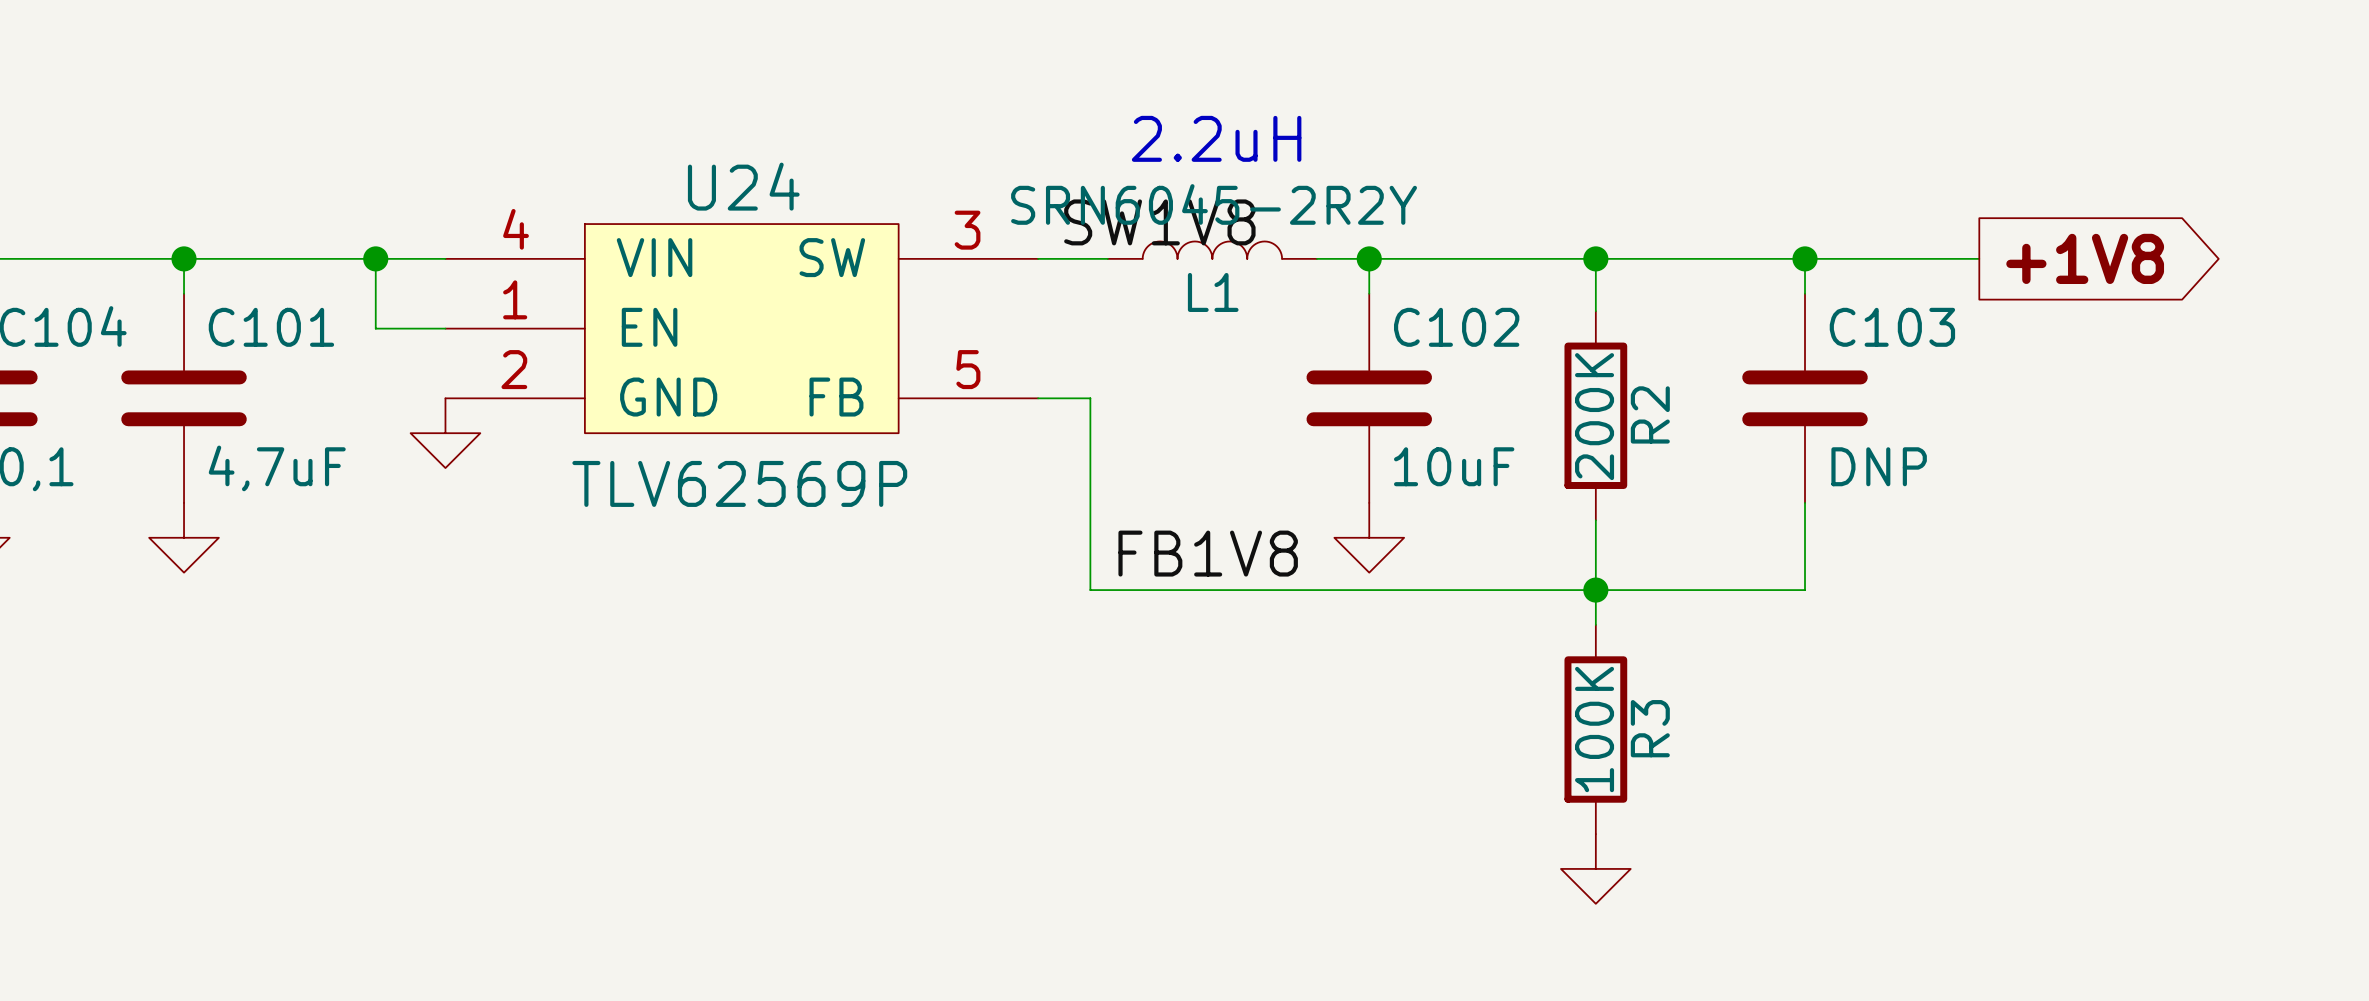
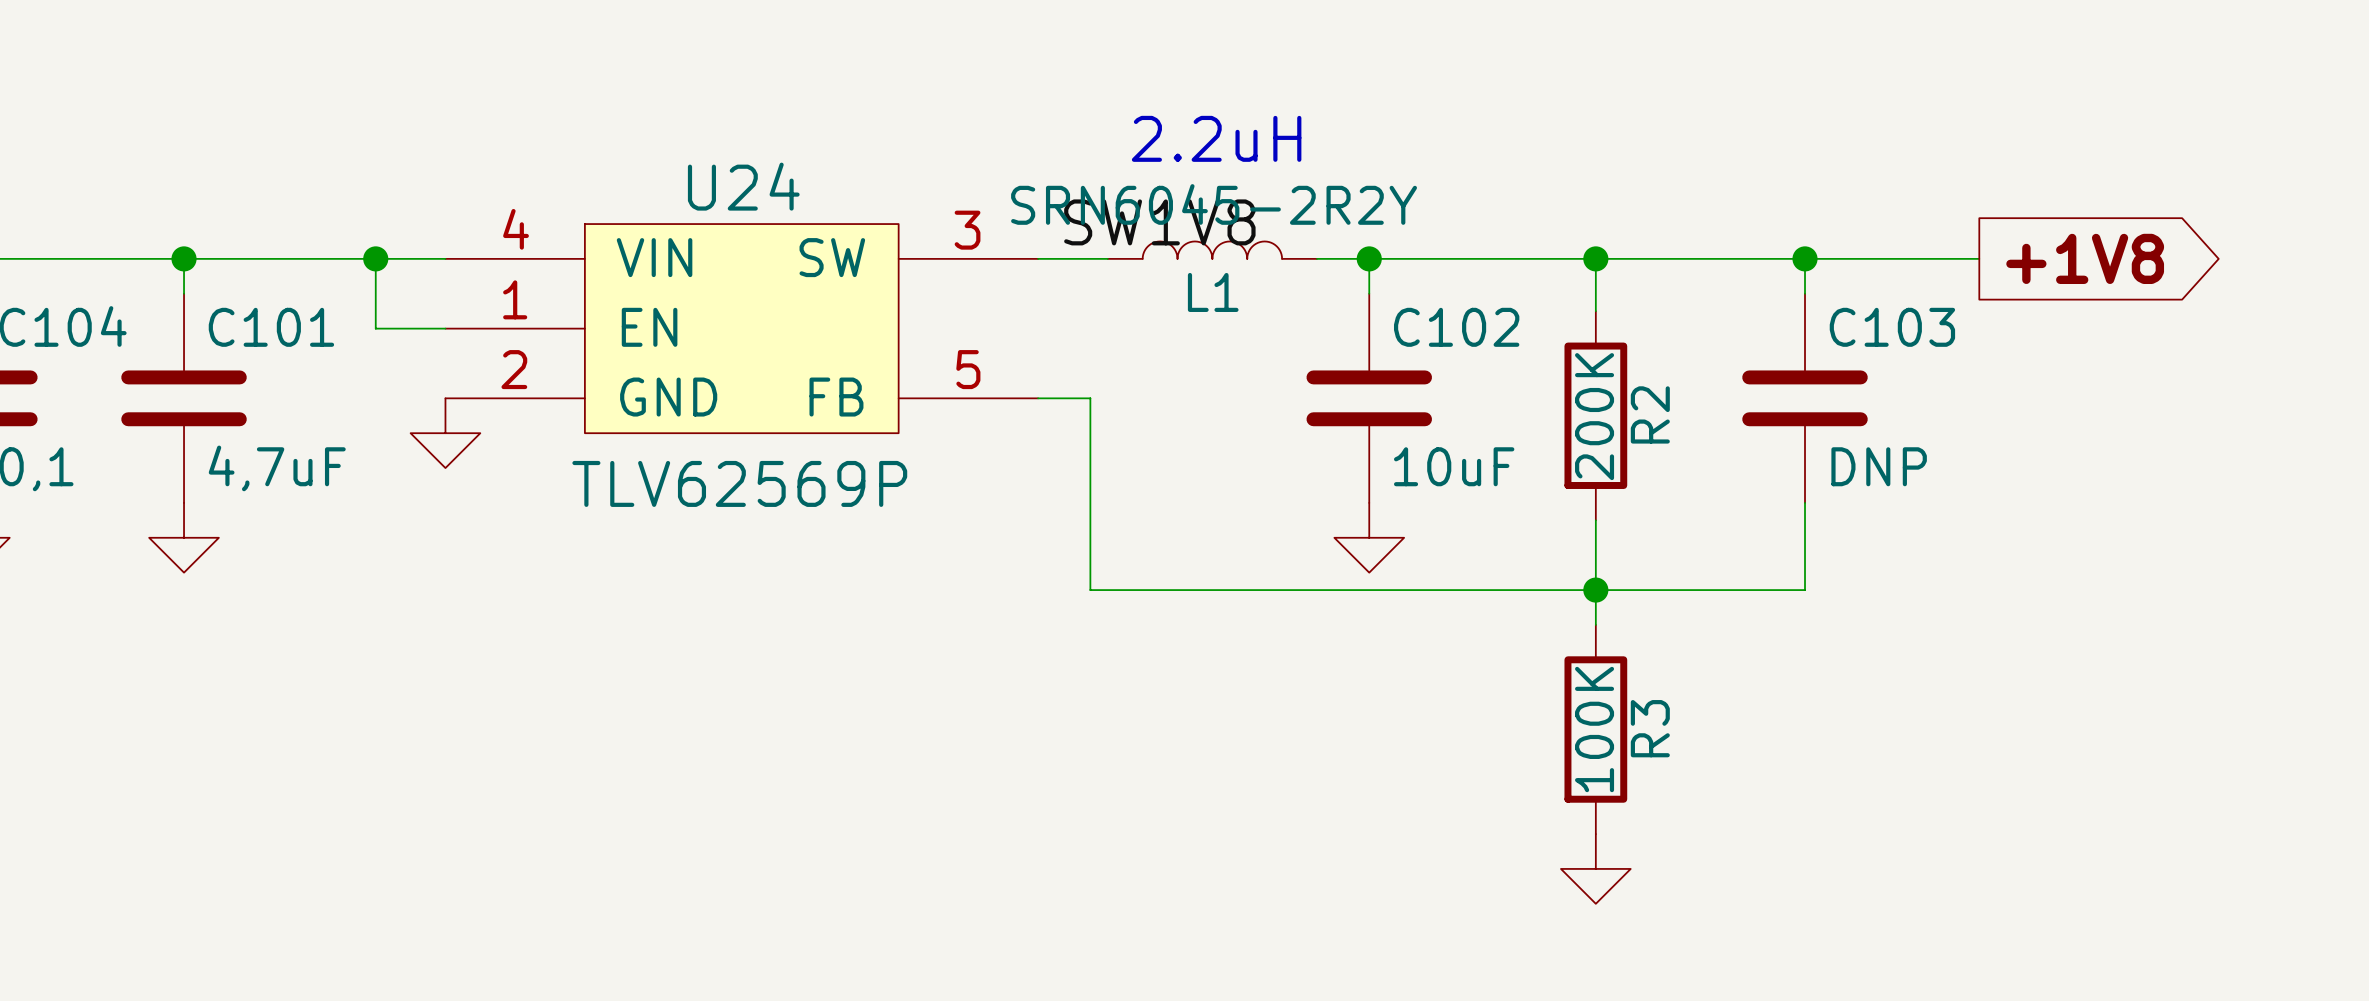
label: FB1V8 (1208, 553) -> none

